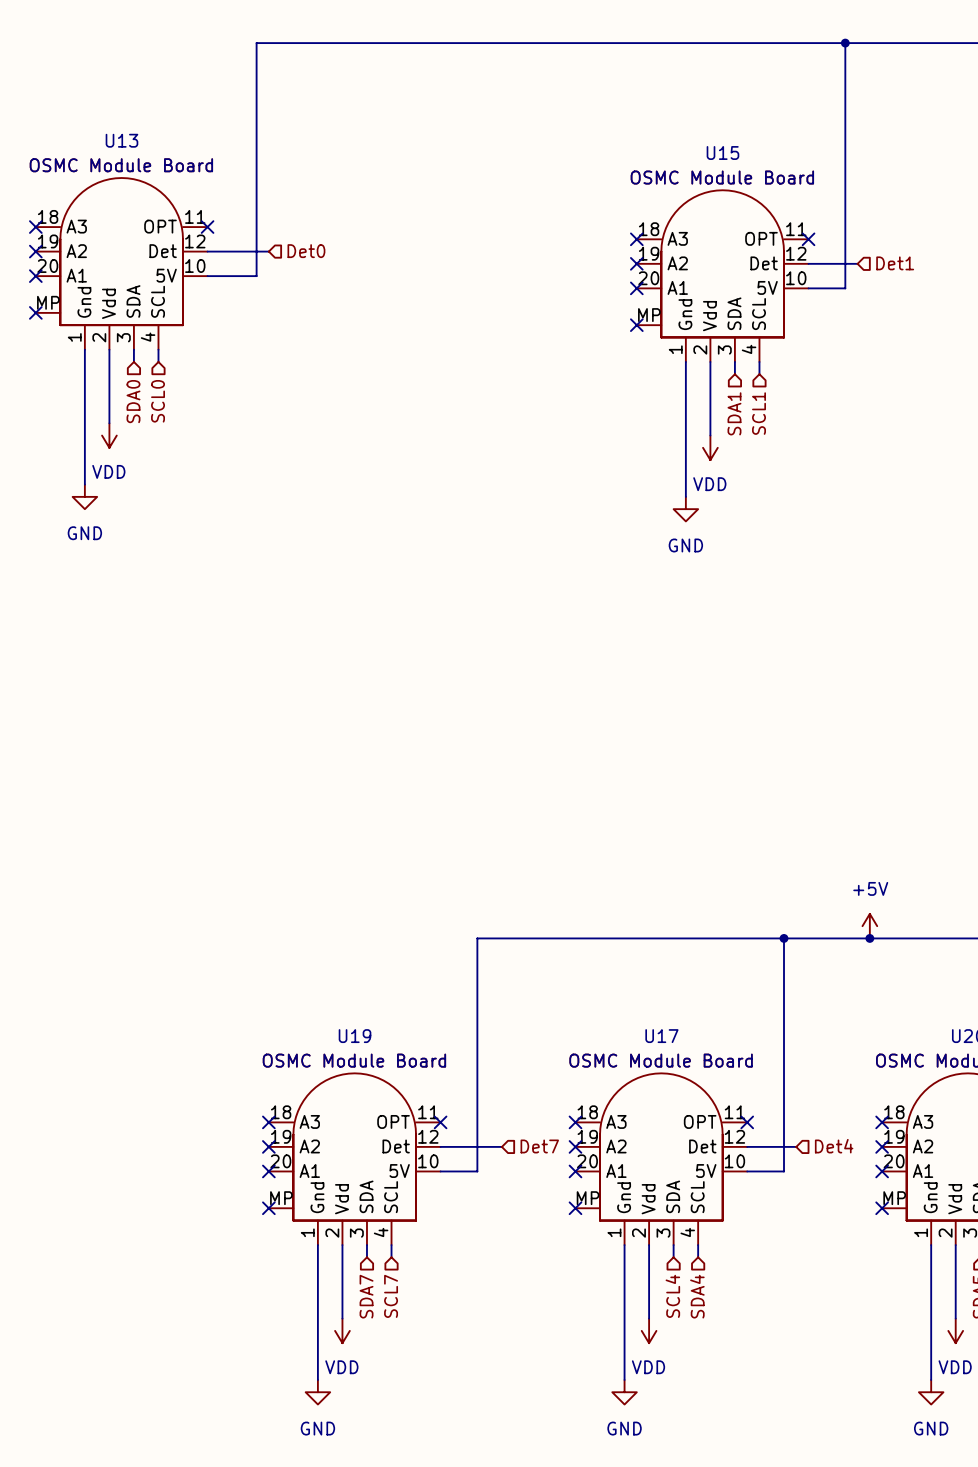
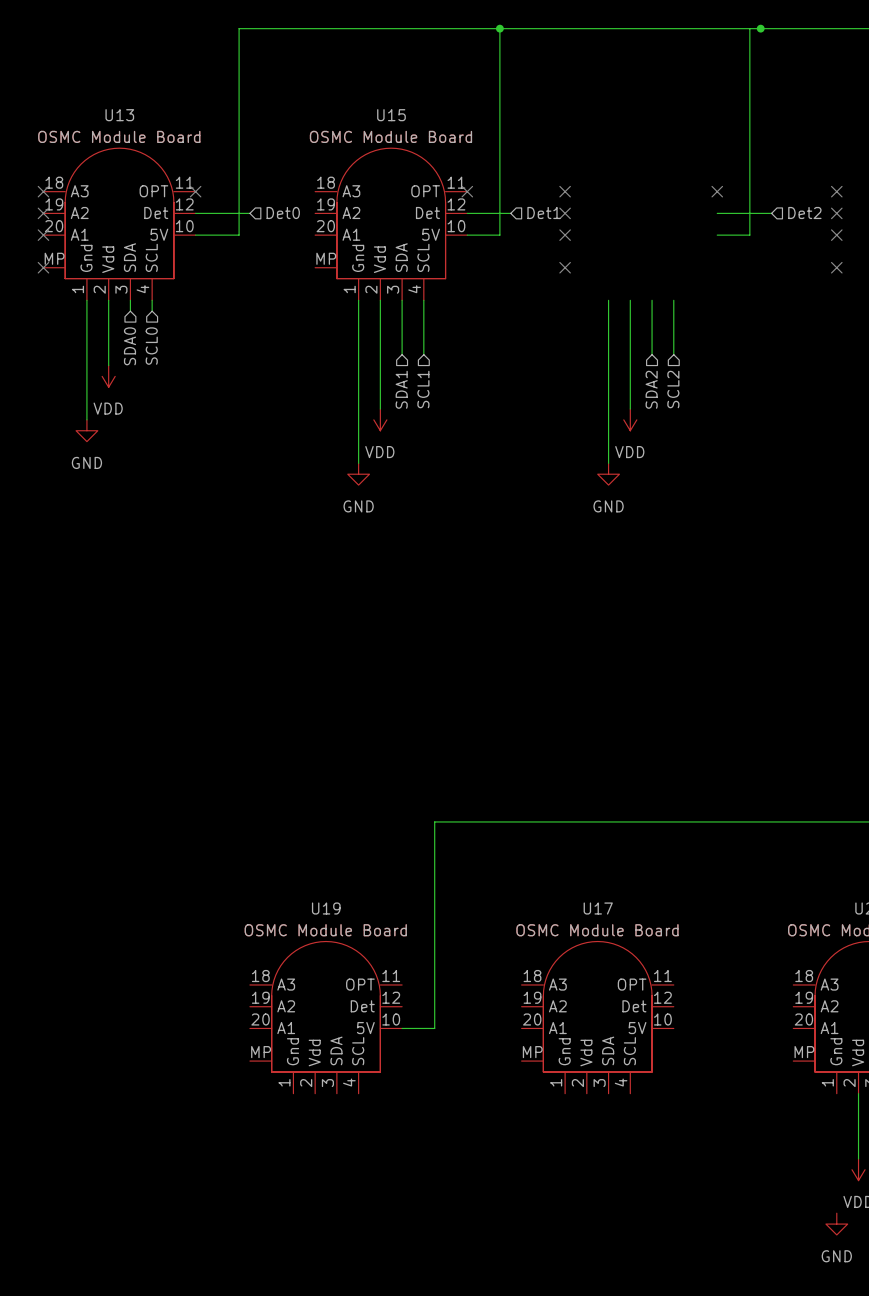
wire: none -> (499, 28) (499, 235) (467, 235)
junction: none -> (499, 28)
wire: none -> (749, 28) (749, 235) (717, 235)
wire: (845, 43) (845, 288) (808, 288) -> none
no-connect mark: none -> (467, 191)
no-connect mark: none -> (565, 191)
no-connect mark: none -> (836, 191)
no-connect mark: (636, 239) -> none
no-connect mark position: (808, 239) -> (717, 191)
wire: none -> (467, 213) (510, 213)
hierarchical label: none -> Det1 (544, 212)
no-connect mark: none -> (565, 213)
wire: none -> (717, 213) (771, 213)
no-connect mark: none -> (836, 213)
no-connect mark: (636, 263) -> none
wire: (808, 263) (857, 263) -> none
hierarchical label: Det1 (895, 263) -> Det2 (804, 212)
no-connect mark: none -> (565, 235)
U15 position: (722, 276) -> (391, 224)
no-connect mark: none -> (836, 235)
no-connect mark: (636, 288) -> none
no-connect mark: none -> (565, 267)
no-connect mark: none -> (836, 267)
no-connect mark: (636, 325) -> none
wire: none -> (358, 300) (358, 463)
wire: none -> (380, 300) (380, 409)
wire: none -> (402, 300) (402, 354)
wire: none -> (423, 300) (423, 354)
wire: none -> (608, 300) (608, 463)
wire: none -> (630, 300) (630, 409)
wire: none -> (652, 300) (652, 354)
wire: none -> (673, 300) (673, 354)
wire: (685, 361) (685, 496) -> none
wire: (710, 361) (710, 435) -> none
wire: (734, 361) (734, 374) -> none
wire: (759, 361) (759, 374) -> none
hierarchical label: SDA1 (734, 413) -> SDA2 (651, 389)
hierarchical label: SCL1 (759, 413) -> SCL2 (673, 389)
power symbol position: VDD (710, 447) -> VDD (630, 419)
hierarchical label: none -> SDA1 (401, 389)
hierarchical label: none -> SCL1 (423, 389)
power symbol: none -> VDD (380, 419)
power symbol position: GND (685, 509) -> GND (608, 474)
power symbol: none -> GND (358, 474)
power symbol: +5V (869, 926) -> none
wire: (784, 938) (784, 1171) (747, 1171) -> none
junction: (784, 938) -> none
junction: (869, 938) -> none
no-connect mark: (268, 1122) -> none
no-connect mark: (440, 1122) -> none
no-connect mark: (575, 1122) -> none
no-connect mark: (747, 1122) -> none
no-connect mark: (882, 1122) -> none
no-connect mark: (268, 1146) -> none
wire: (440, 1146) (501, 1146) -> none
hierarchical label: Det7 (539, 1146) -> none
no-connect mark: (575, 1146) -> none
wire: (747, 1146) (796, 1146) -> none
hierarchical label: Det4 (834, 1146) -> none
no-connect mark: (882, 1146) -> none
no-connect mark: (268, 1171) -> none
no-connect mark: (575, 1171) -> none
no-connect mark: (882, 1171) -> none
no-connect mark: (268, 1208) -> none
no-connect mark: (575, 1208) -> none
no-connect mark: (882, 1208) -> none
wire: (317, 1245) (317, 1379) -> none
wire: (342, 1245) (342, 1318) -> none
wire: (366, 1245) (366, 1257) -> none
wire: (391, 1245) (391, 1257) -> none
wire: (624, 1245) (624, 1379) -> none
wire: (649, 1245) (649, 1318) -> none
wire: (673, 1245) (673, 1257) -> none
wire: (698, 1245) (698, 1257) -> none
wire: (931, 1245) (931, 1379) -> none
hierarchical label: SDA7 (366, 1296) -> none
hierarchical label: SCL7 (391, 1296) -> none
hierarchical label: SCL4 (672, 1296) -> none
hierarchical label: SDA4 (697, 1296) -> none
power symbol: VDD (342, 1330) -> none
power symbol: VDD (649, 1330) -> none
power symbol: GND (317, 1392) -> none
power symbol: GND (624, 1392) -> none

